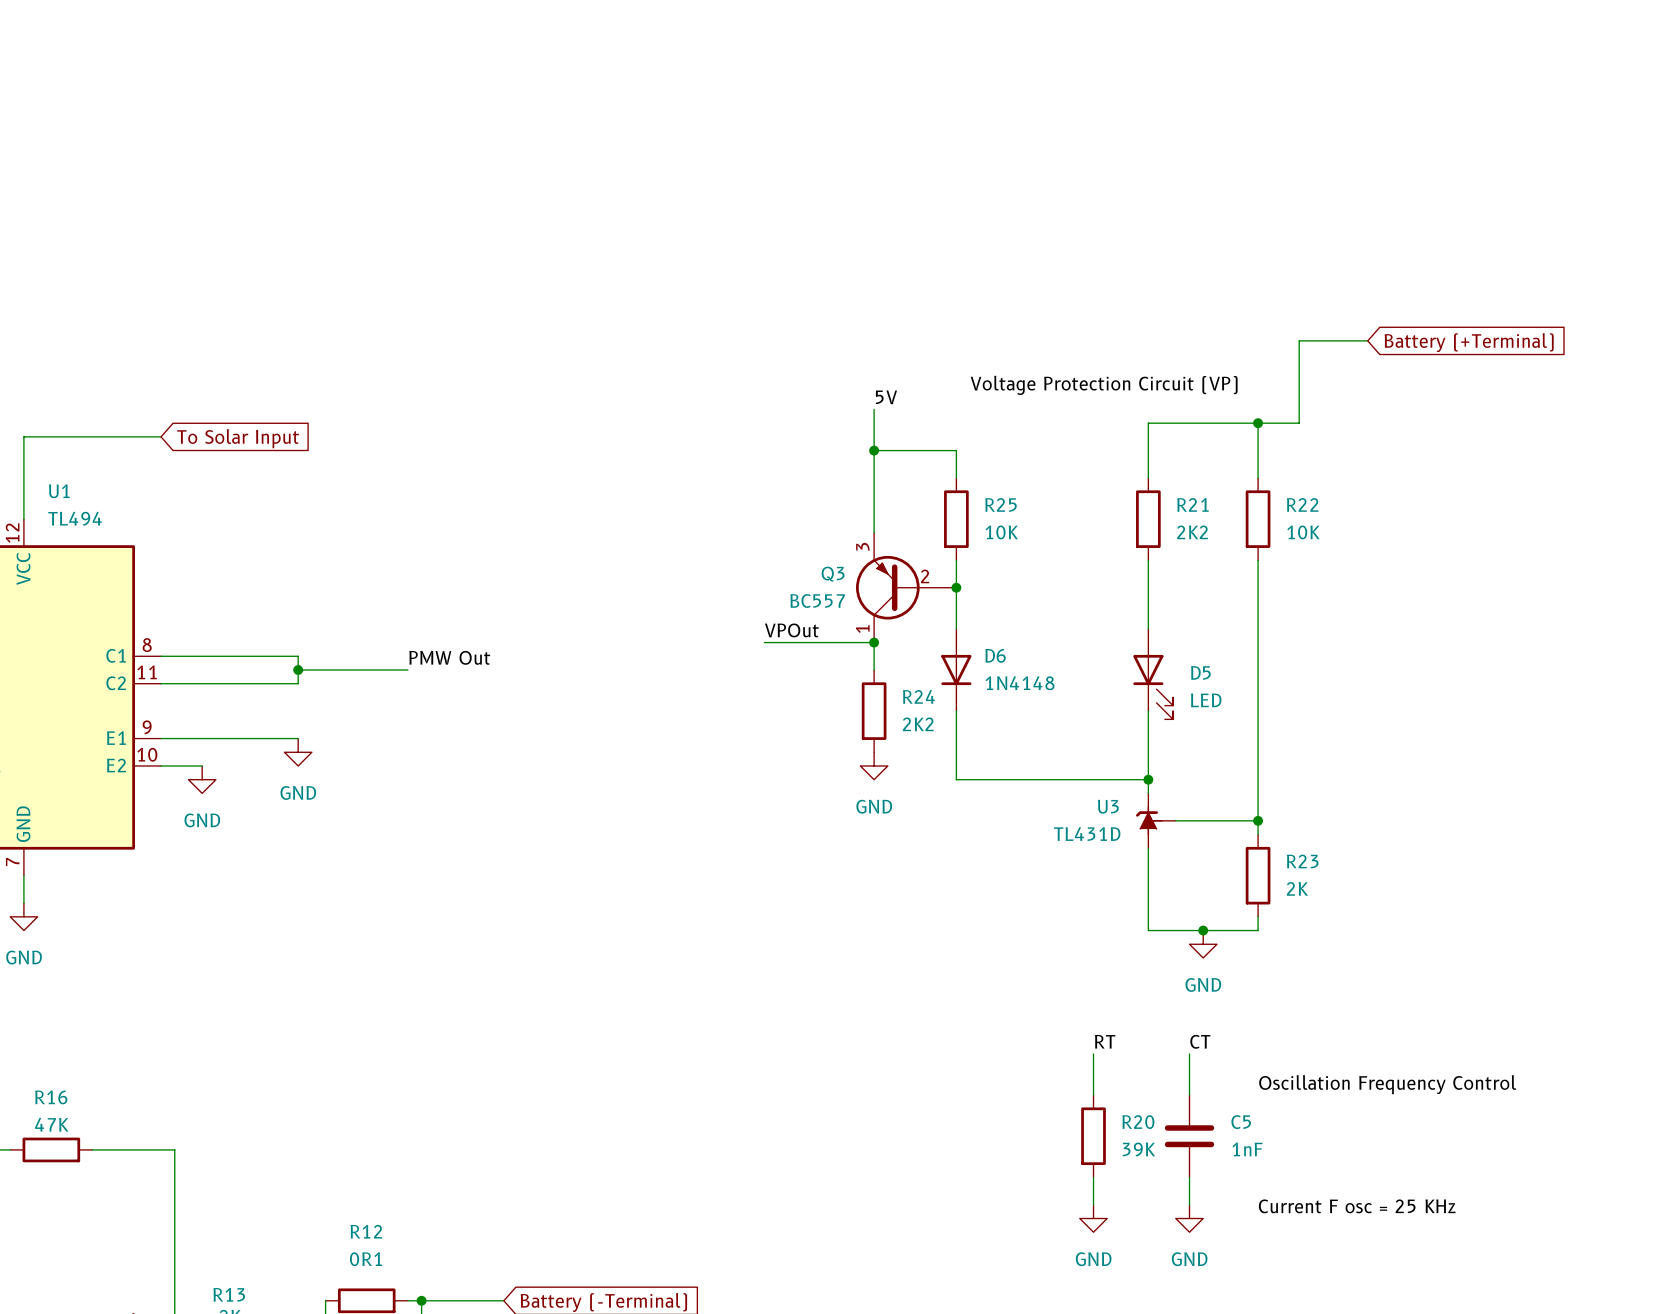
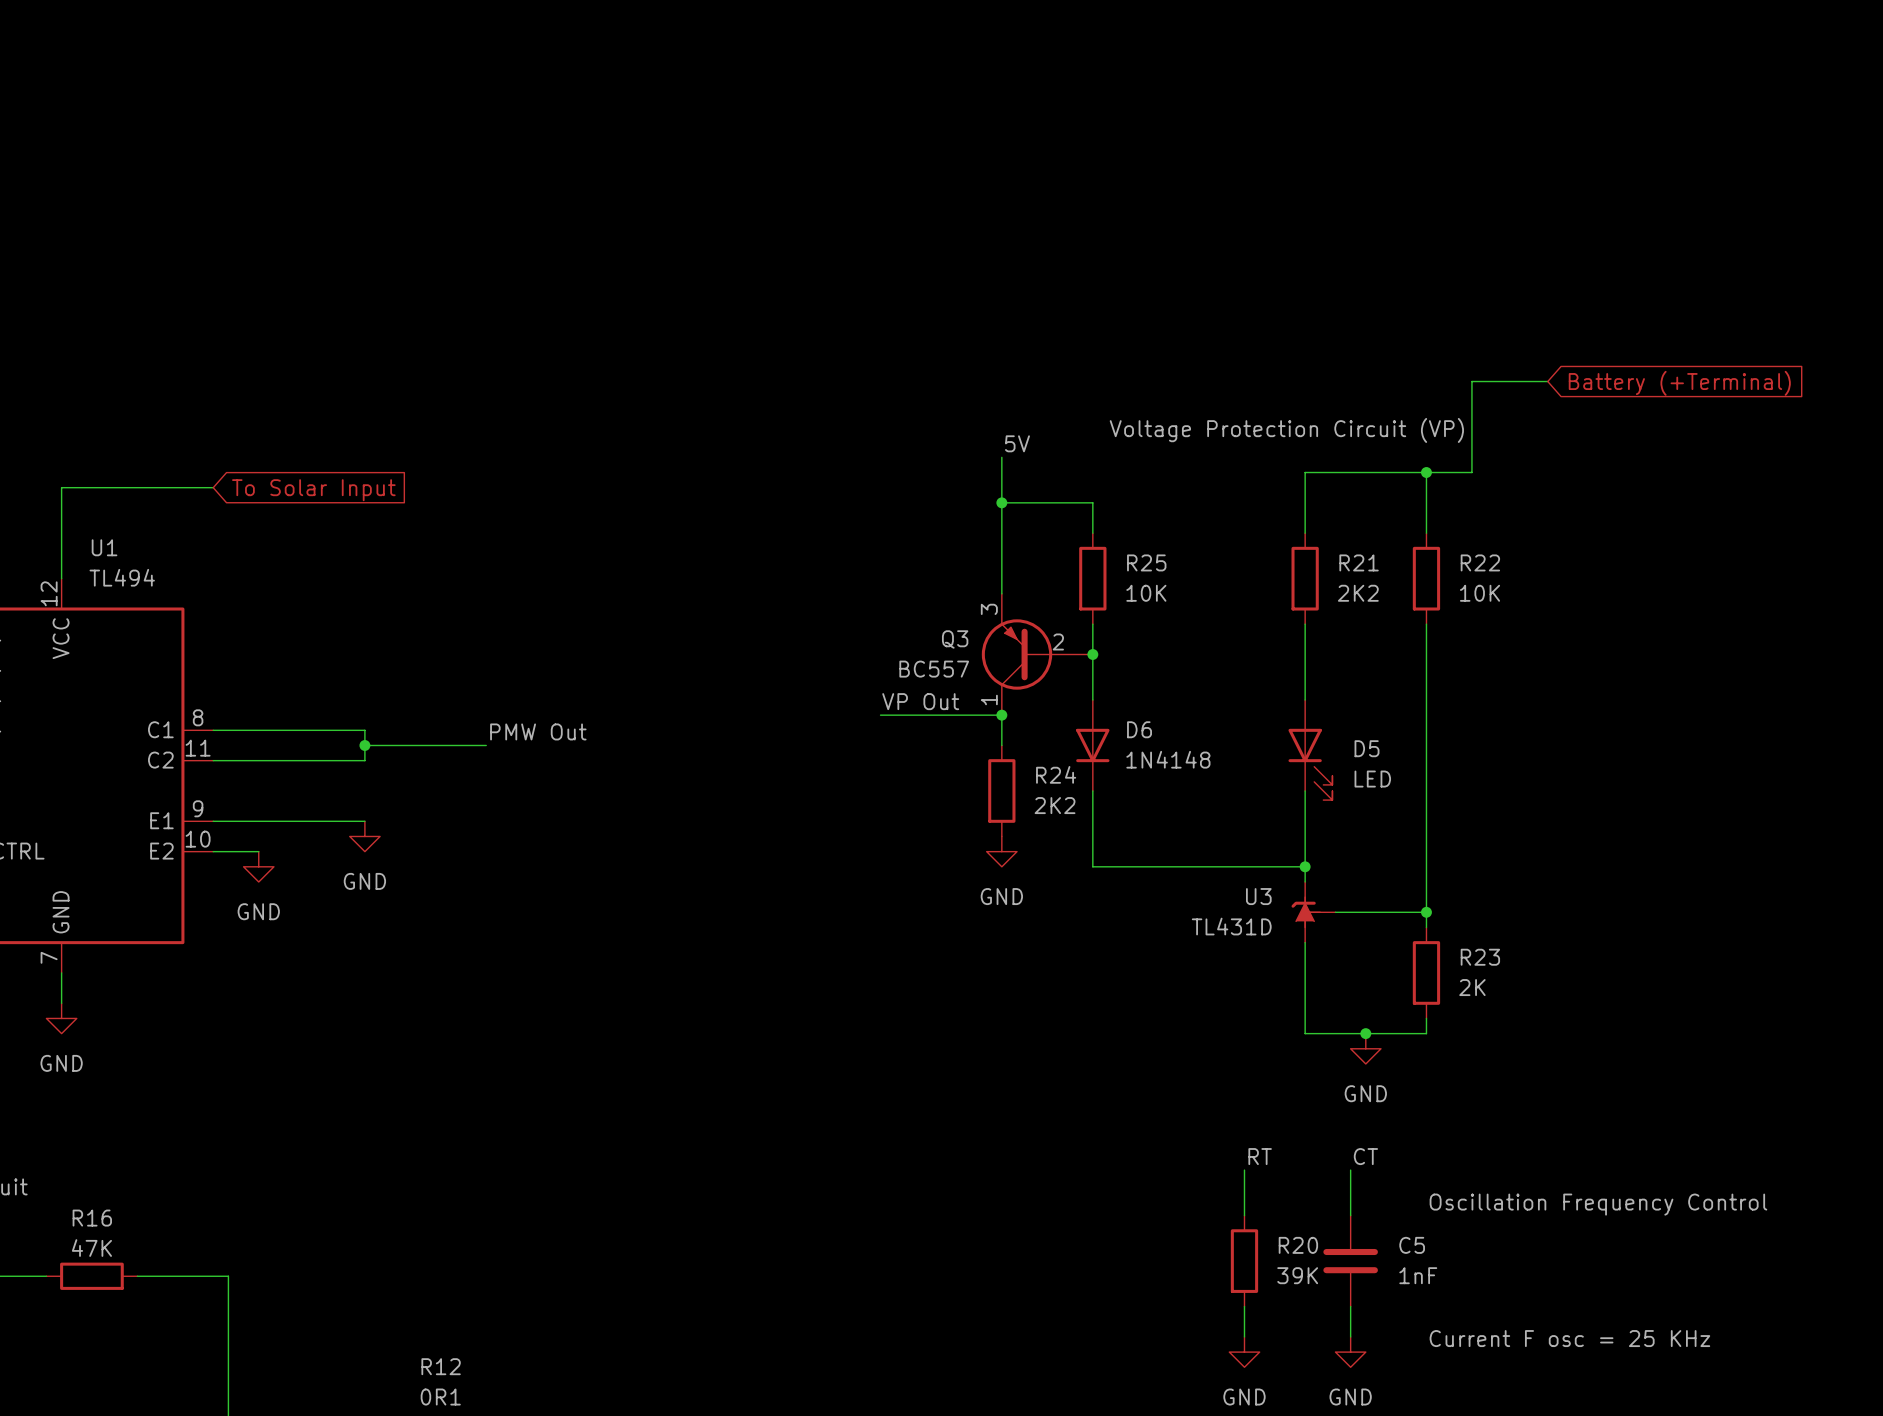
label: VPOut (791, 630) -> VP Out (920, 701)

